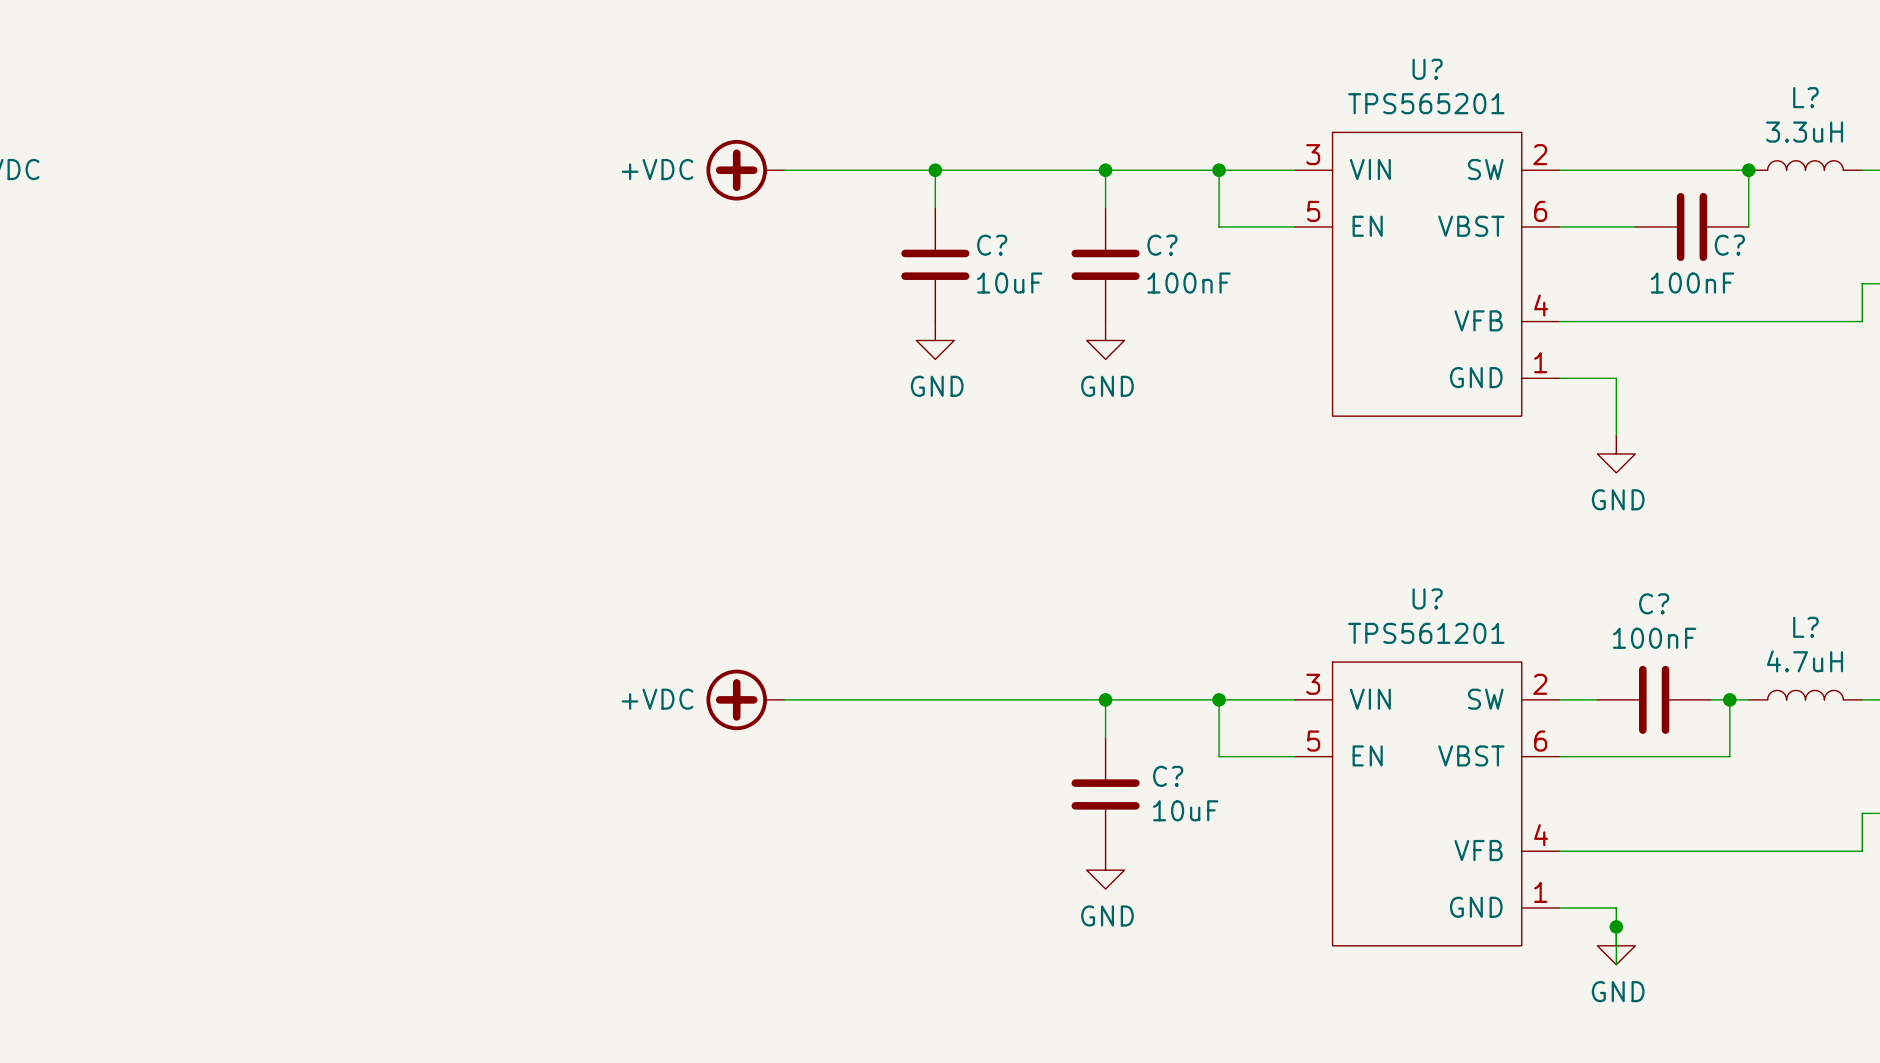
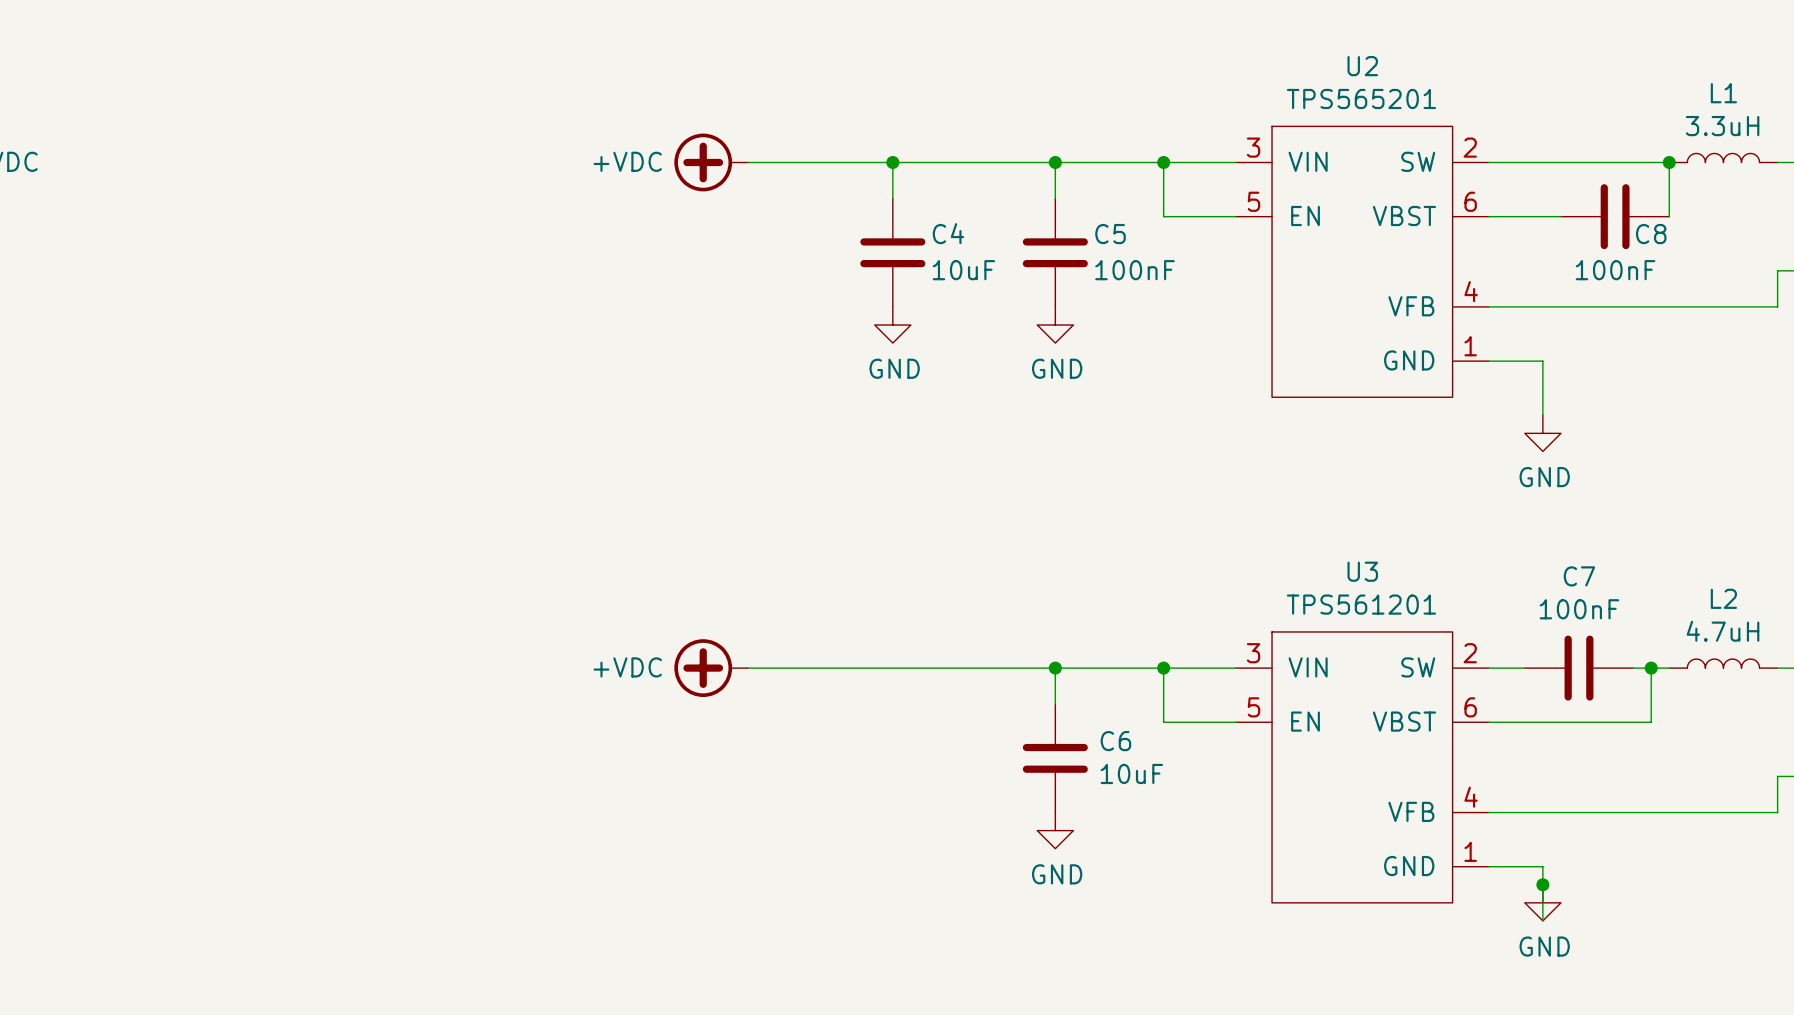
U? name: U? (1427, 69) -> U2 (1362, 66)
L? name: L? (1805, 97) -> L1 (1723, 93)
C? name: C? (992, 245) -> C4 (948, 233)
C? name: C? (1162, 245) -> C5 (1110, 234)
C? name: C? (1729, 245) -> C8 (1651, 234)
U? name: U? (1427, 598) -> U3 (1362, 571)
C? name: C? (1654, 603) -> C7 (1579, 576)
L? name: L? (1805, 627) -> L2 (1723, 598)
C? name: C? (1168, 776) -> C6 (1115, 741)

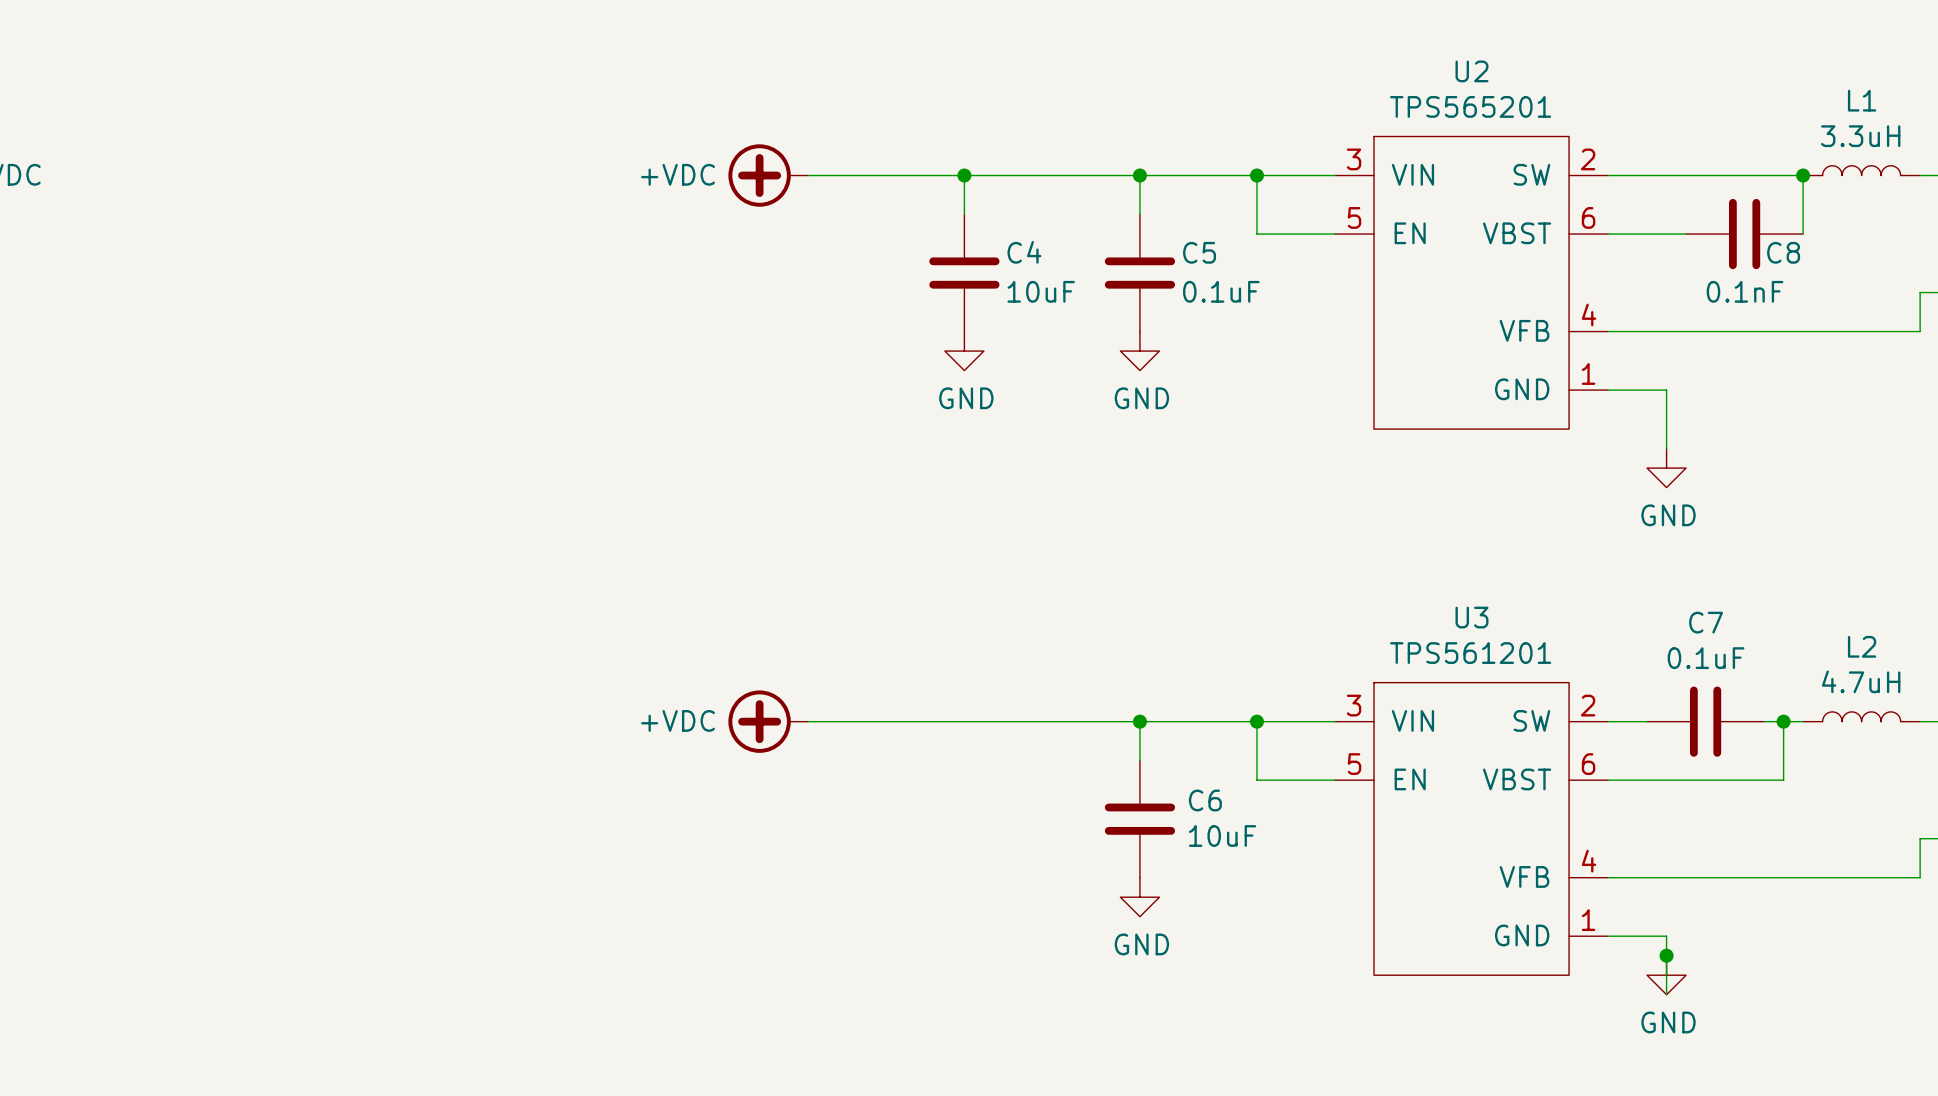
C5 value: 100nF (1135, 270) -> 0.1uF (1221, 291)
C8 value: 100nF (1615, 270) -> 0.1nF (1745, 291)
C7 value: 100nF (1579, 609) -> 0.1uF (1706, 658)

